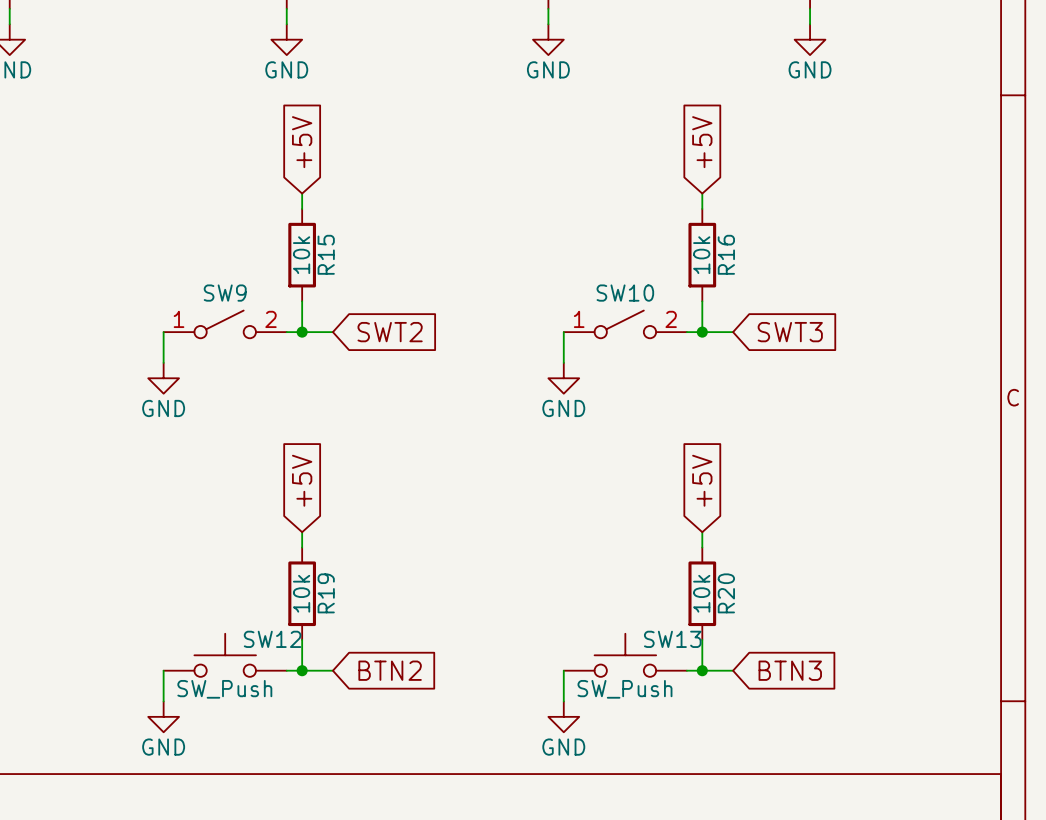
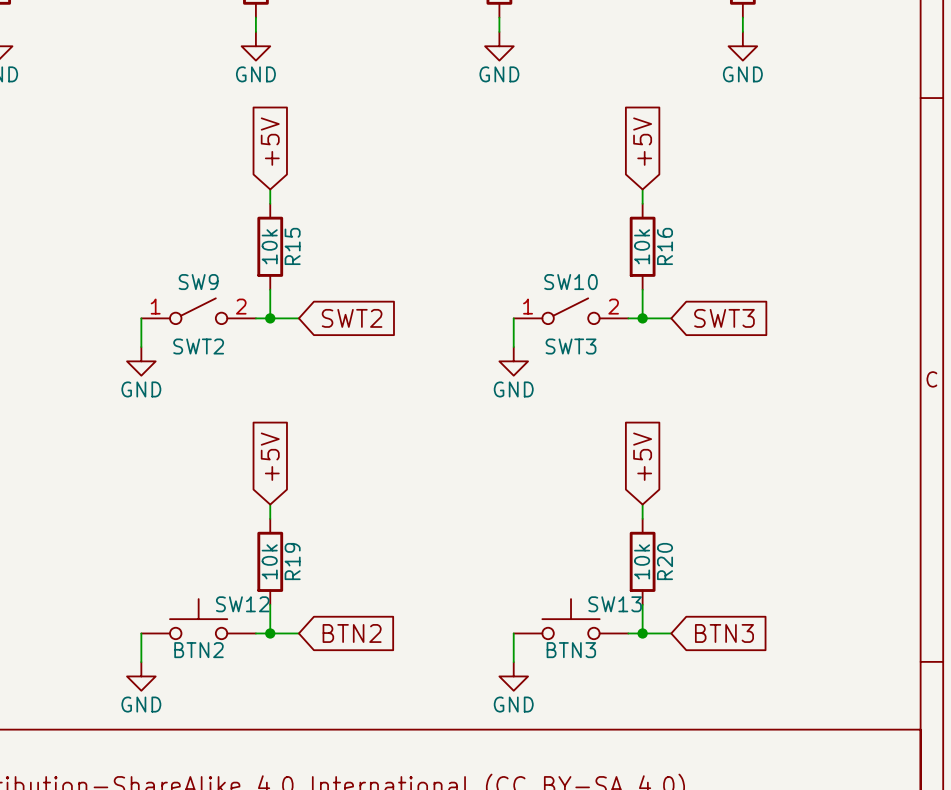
SW9 value: none -> SWT2 (198, 346)
SW10 value: none -> SWT3 (571, 346)
SW12 value: SW_Push (224, 689) -> BTN2 (198, 650)
SW13 value: SW_Push (624, 689) -> BTN3 (571, 650)

